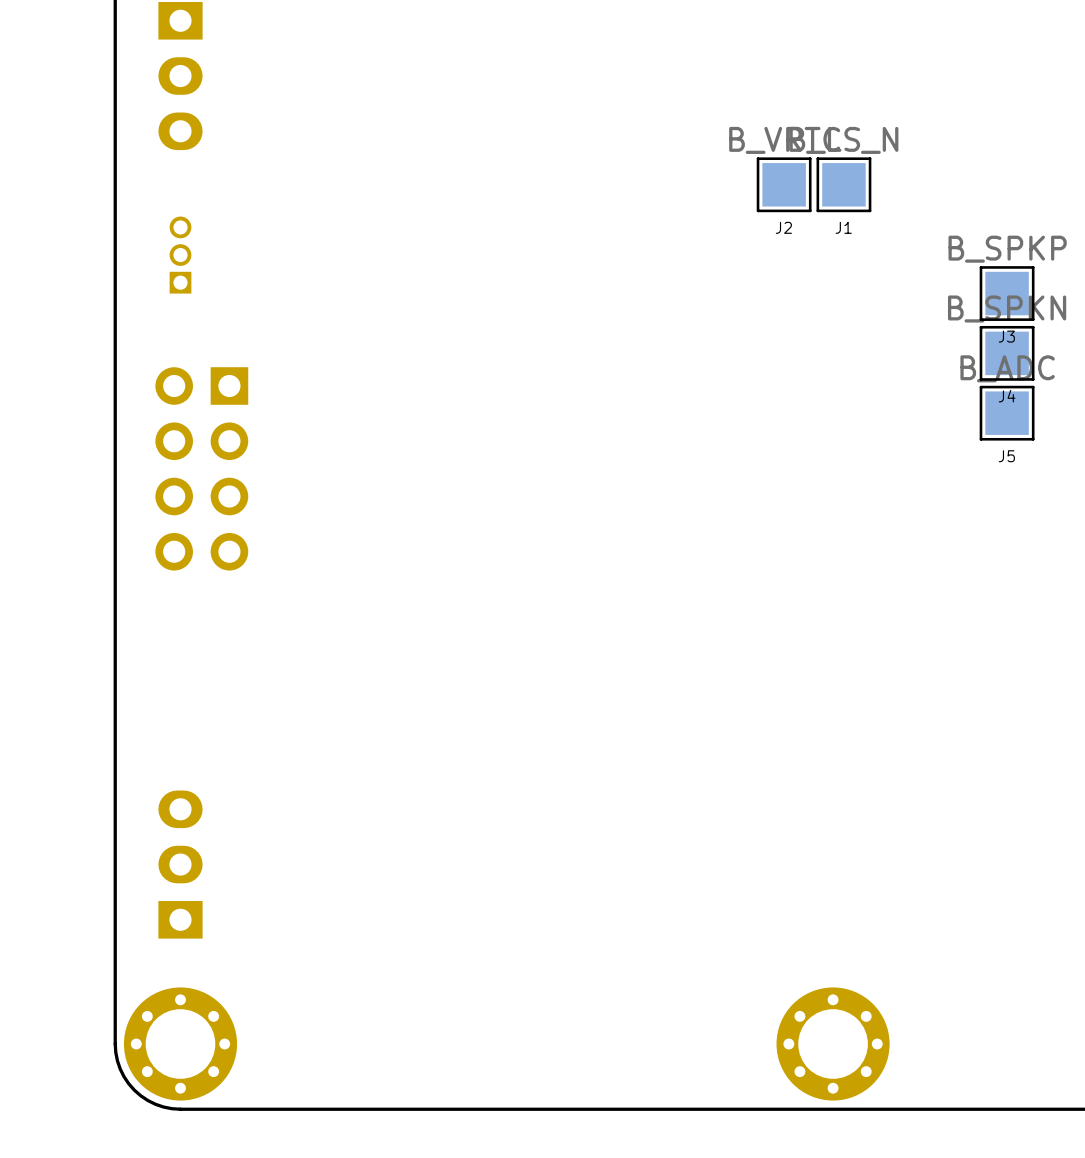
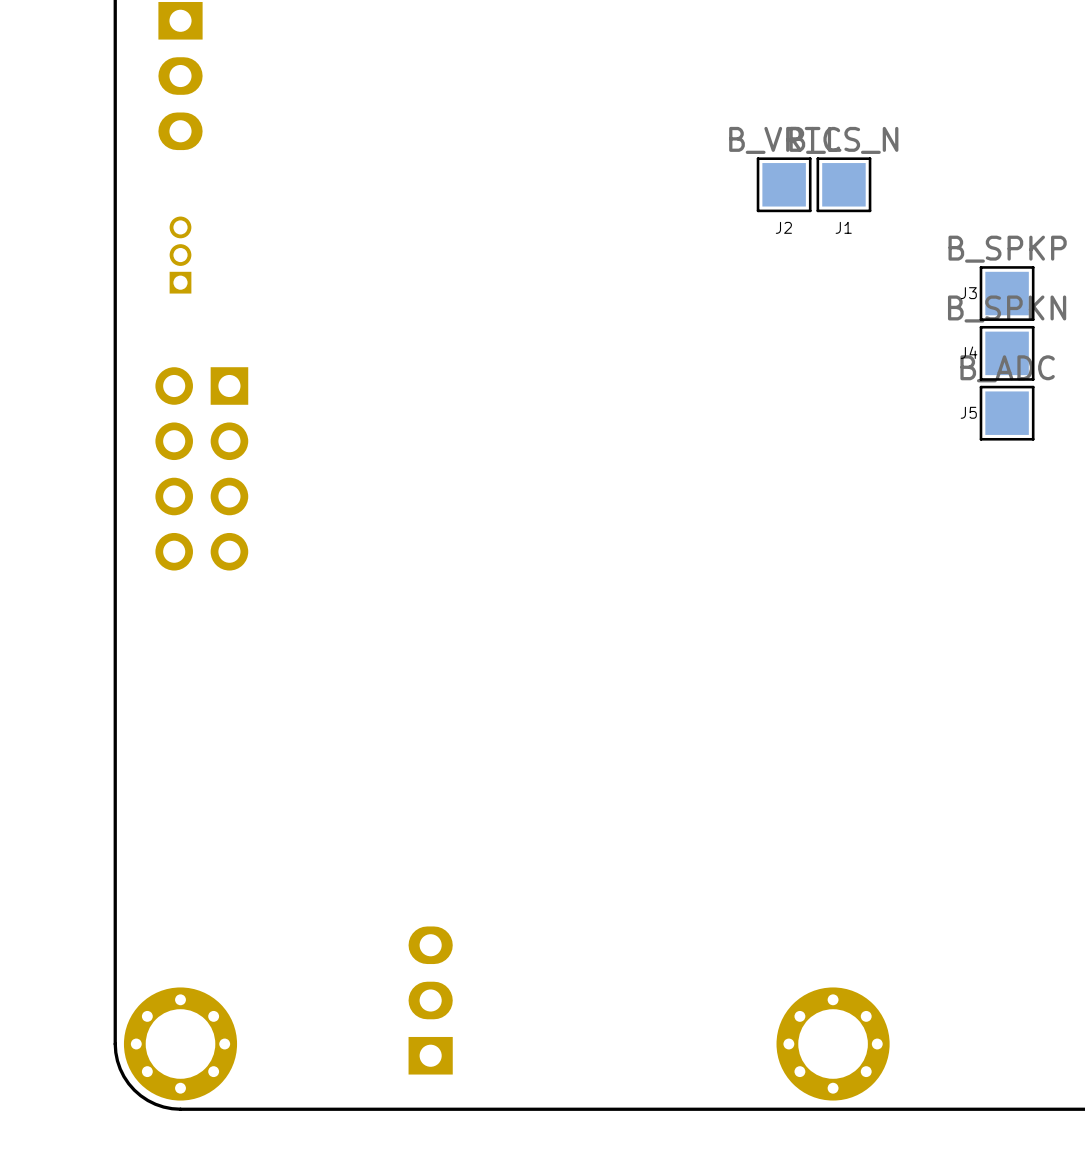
J3 name position: J3 (1006, 336) -> J3 (968, 293)
J4 name position: J4 (1007, 396) -> J4 (969, 352)
J5 name position: J5 (1006, 456) -> J5 (968, 412)
part position: (180, 864) -> (430, 1000)

